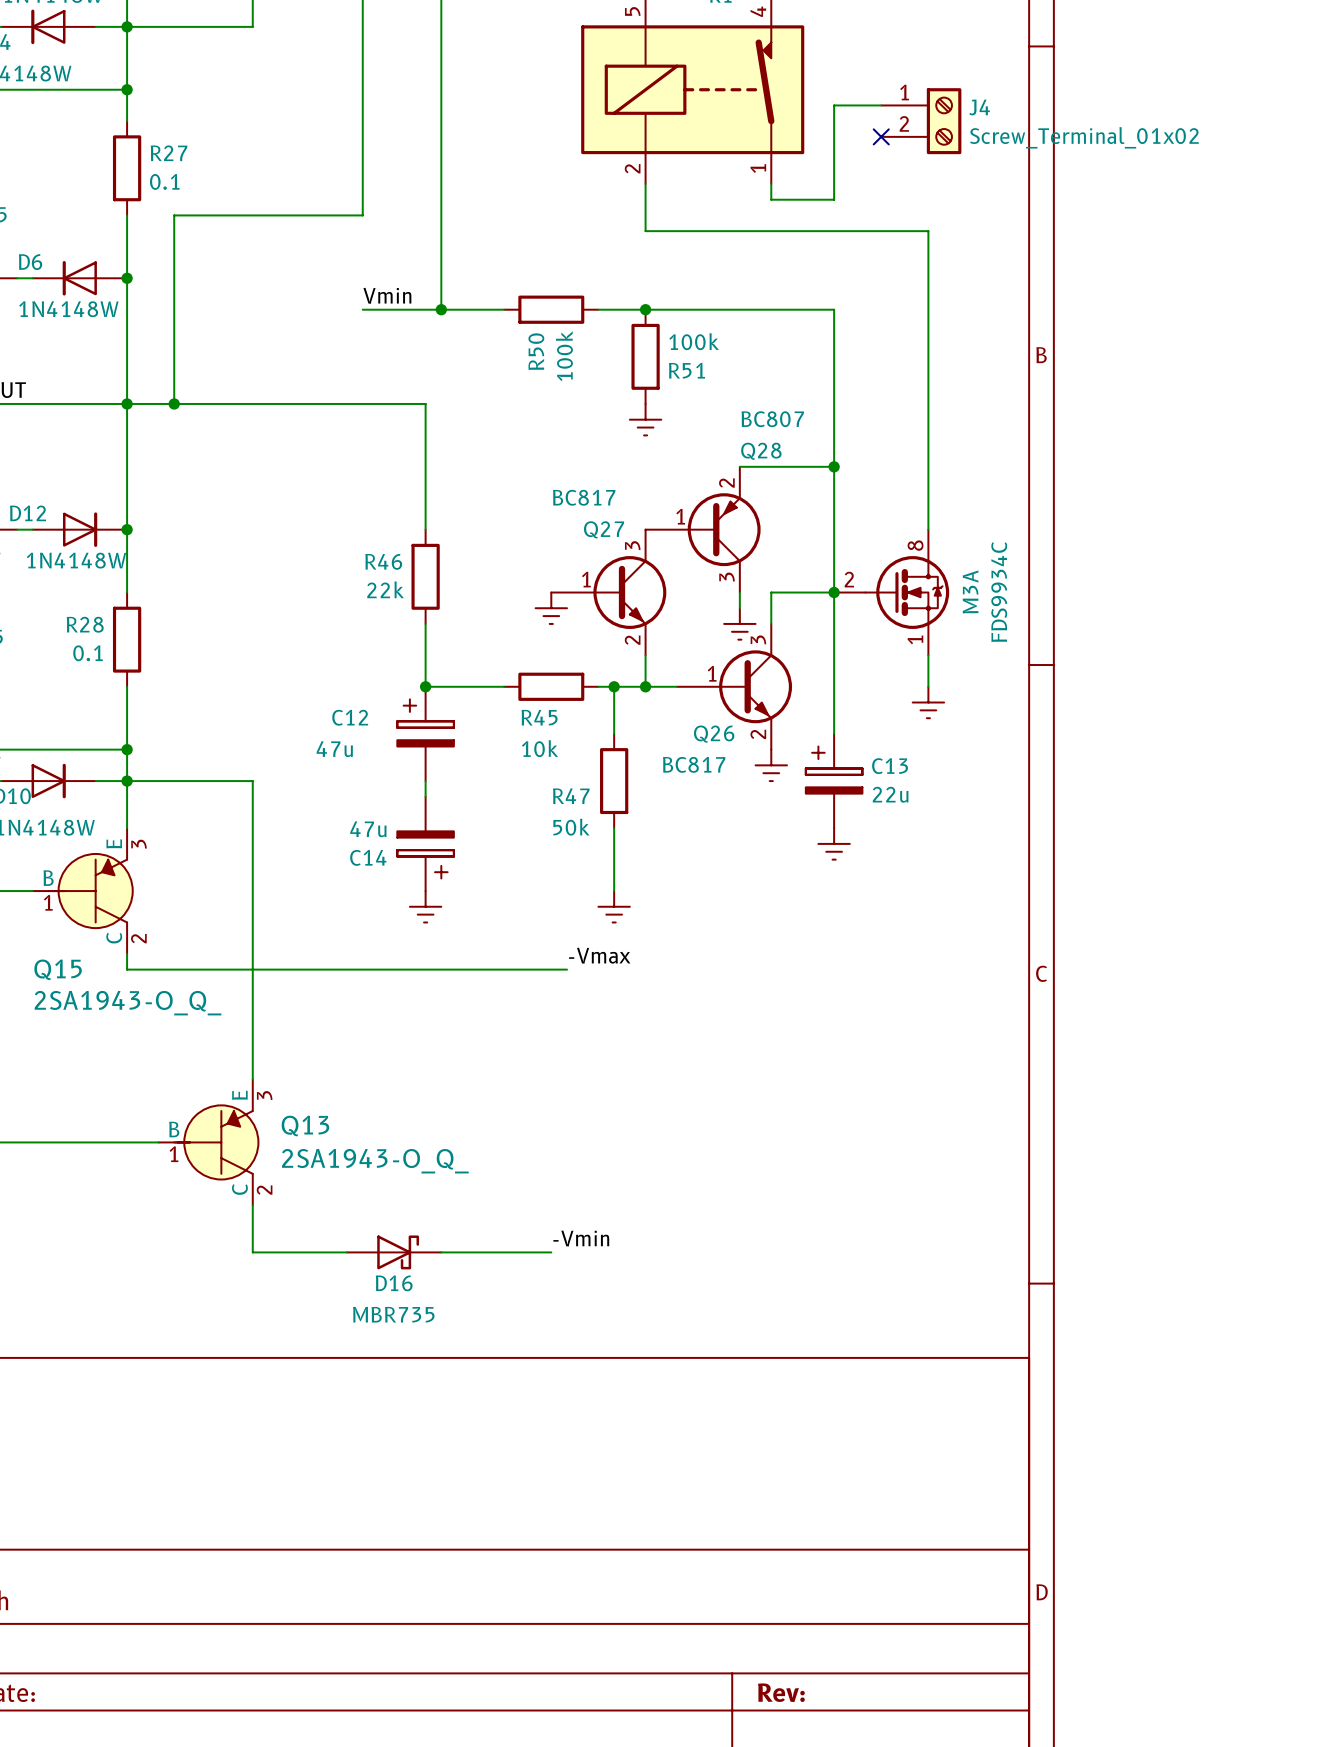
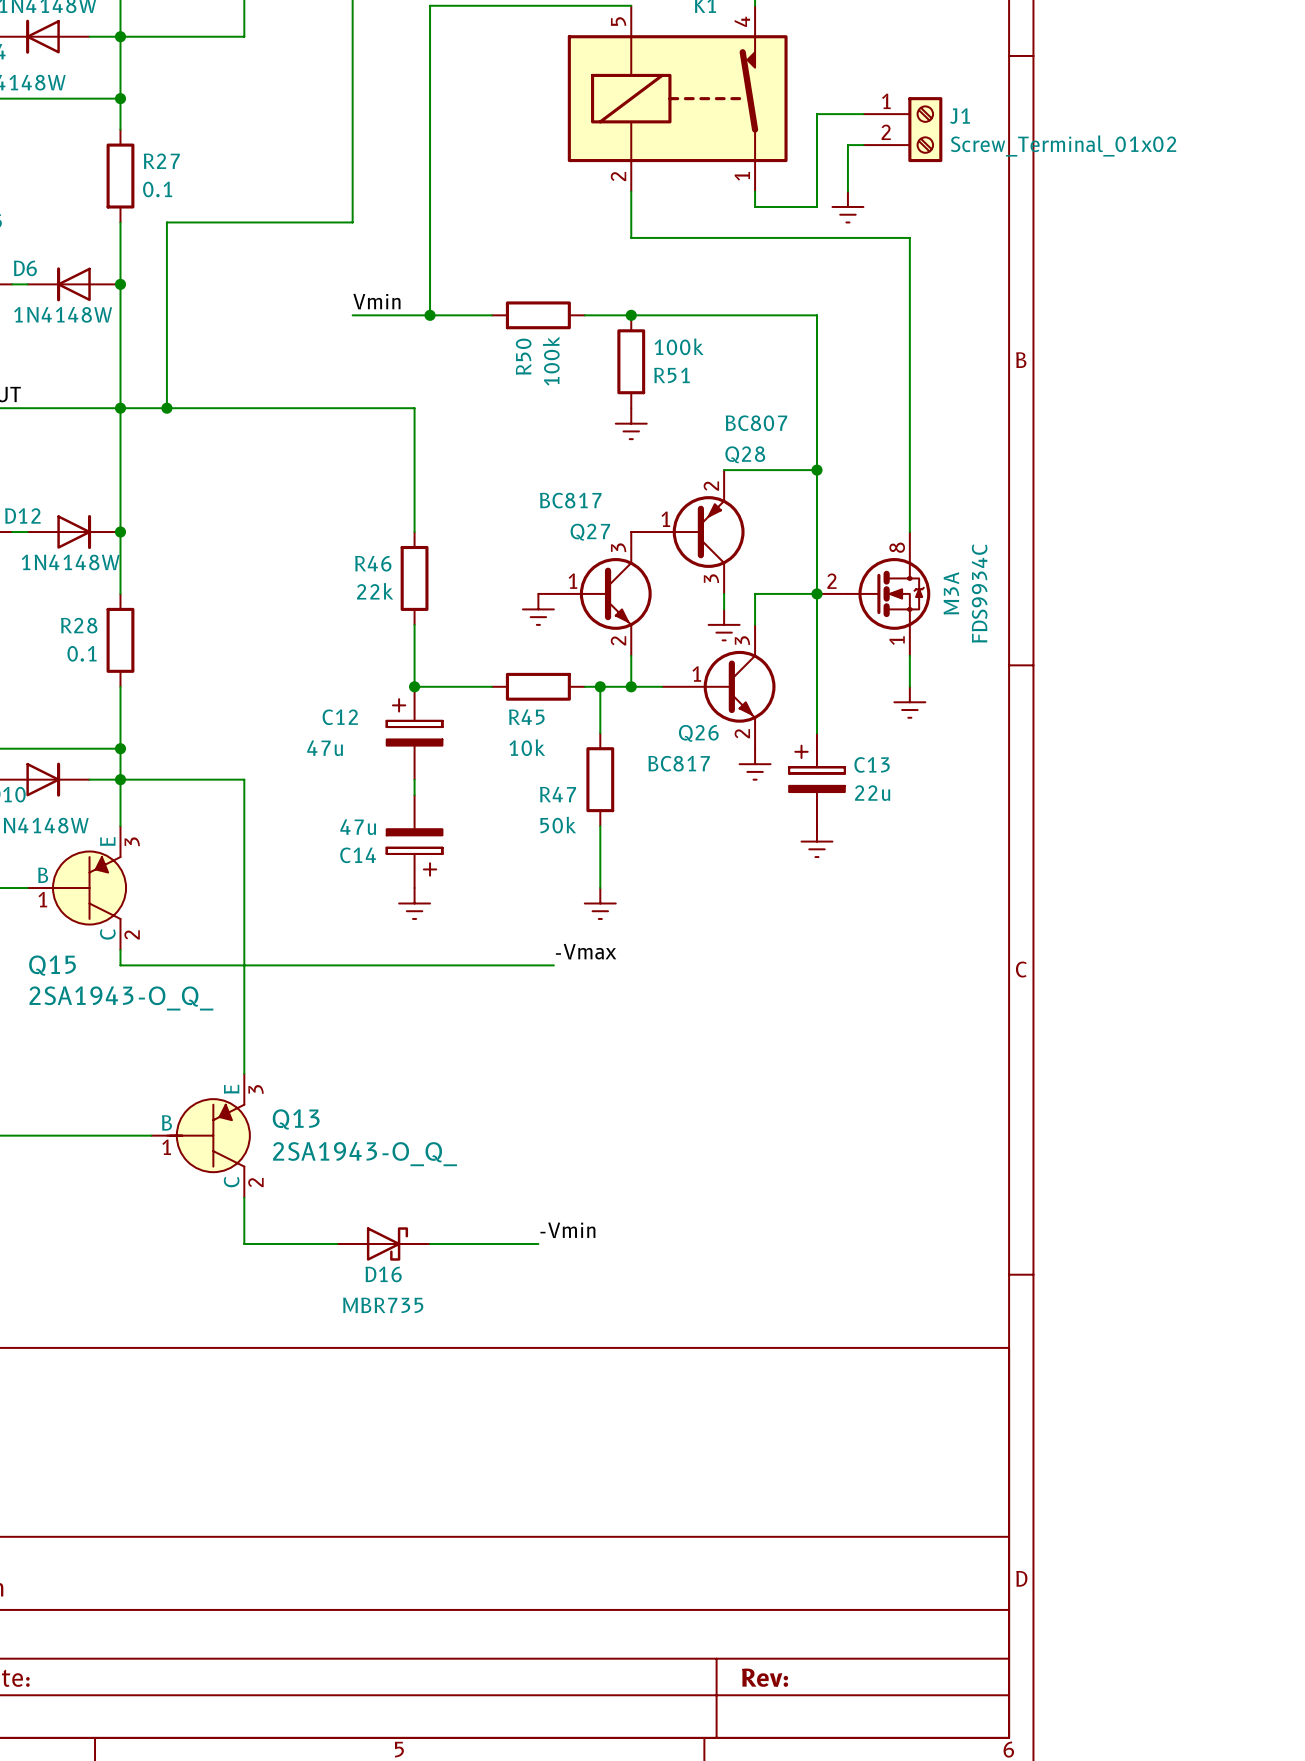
J4 name: J4 (979, 107) -> J1 (960, 116)
wire: none -> (863, 145) (847, 145) (847, 191)
no-connect mark: (881, 136) -> none
power symbol: none -> (847, 206)

